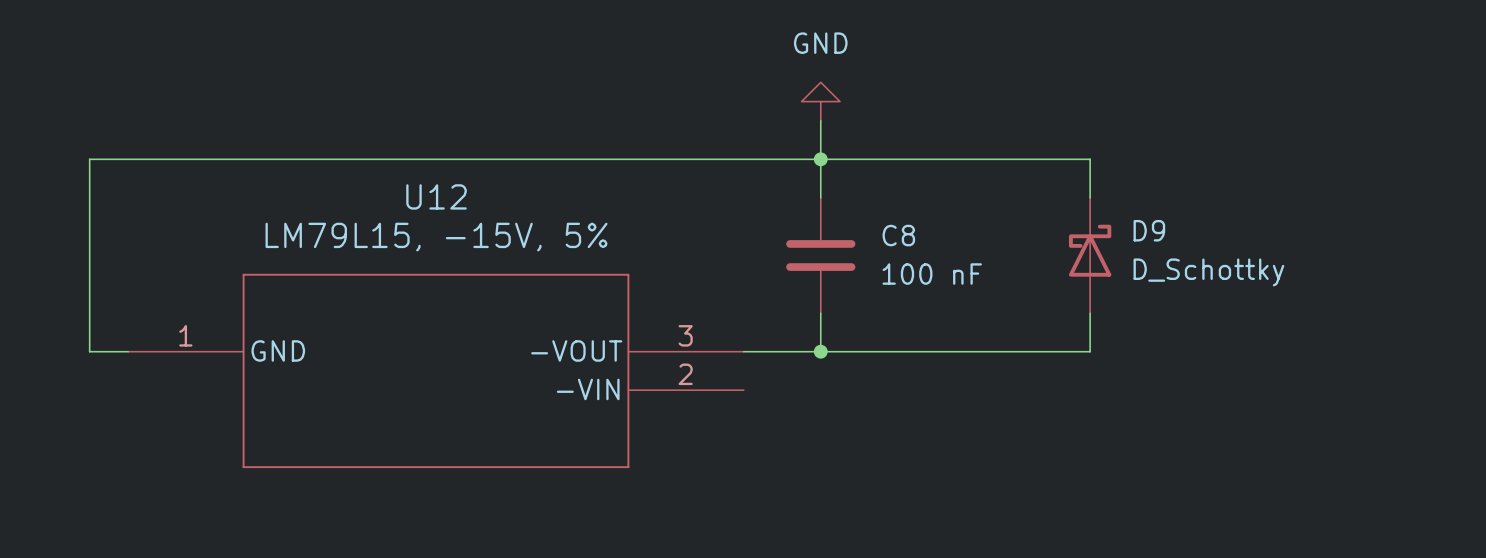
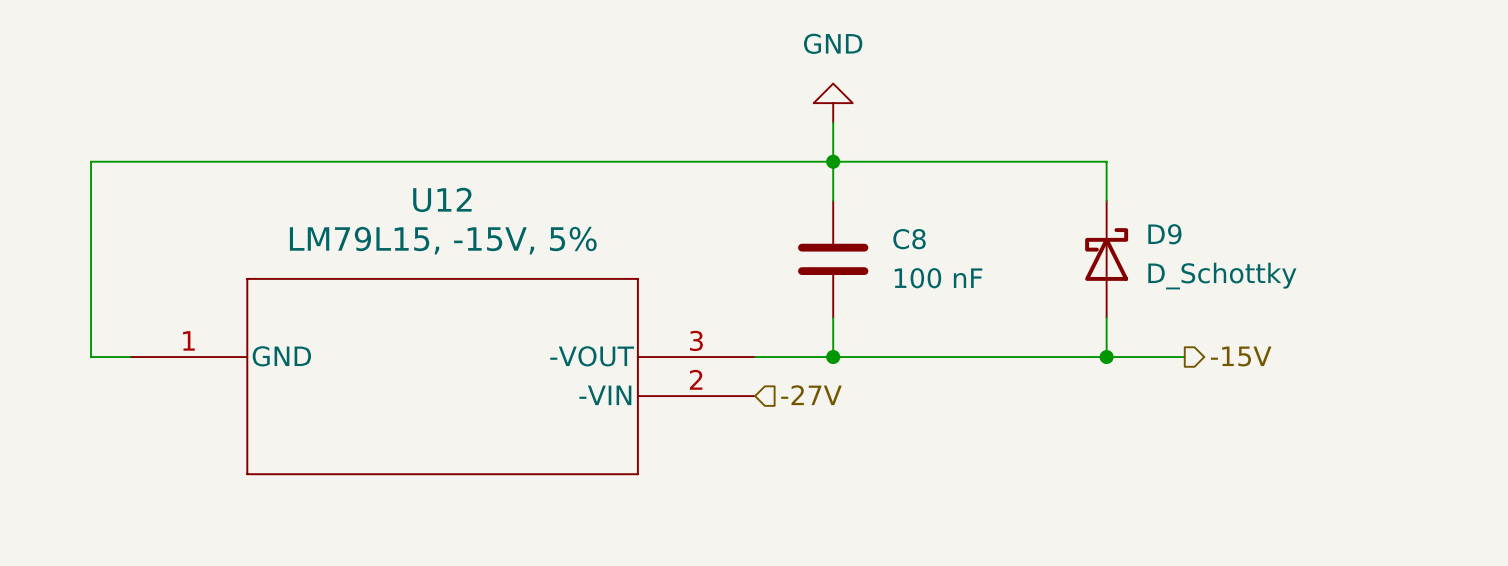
hierarchical label: none -> -15V (1241, 356)
wire: none -> (1106, 357) (1184, 357)
junction: none -> (1106, 357)
hierarchical label: none -> -27V (811, 395)

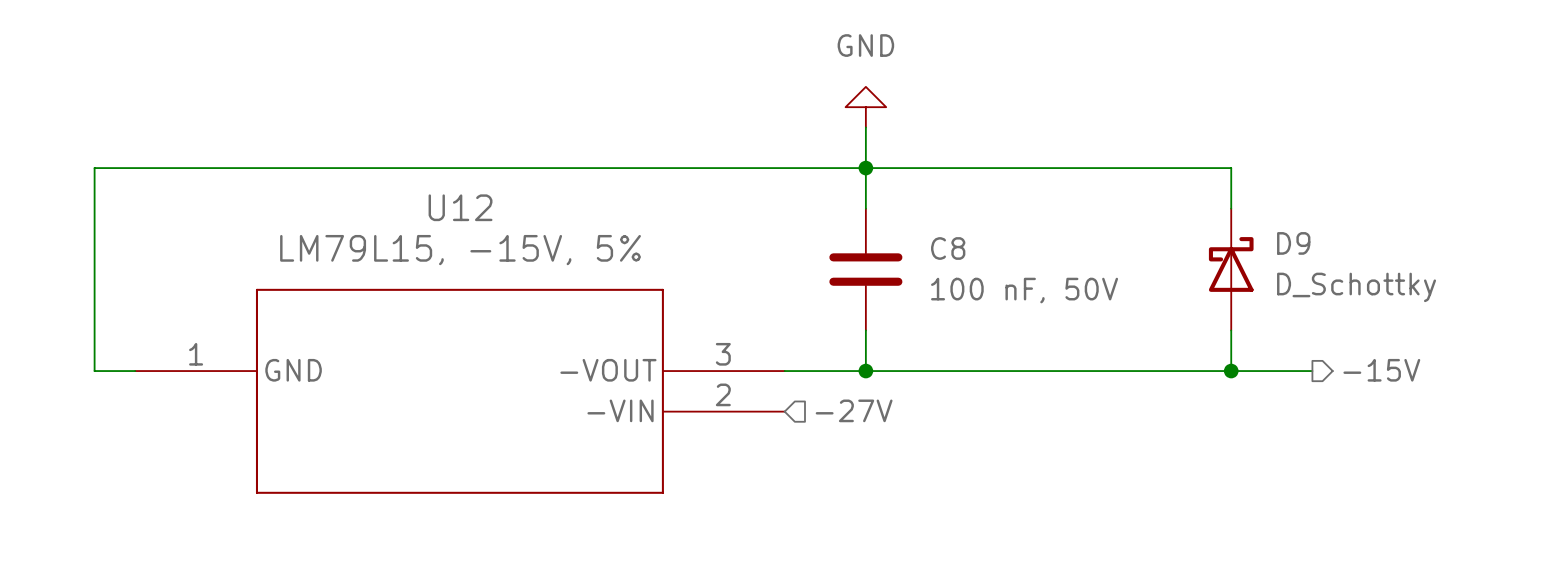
wire: (1106, 161) (1106, 200) -> (1150, 168) (1231, 168) (1231, 208)
D9 position: (1106, 259) -> (1231, 269)
C8 value: 100 nF (938, 278) -> 100 nF, 50V (1024, 290)
wire: (1106, 317) (1106, 357) -> none
wire: none -> (1231, 330) (1231, 371) (1312, 371)
hierarchical label position: -15V (1241, 356) -> -15V (1381, 370)
junction position: (1106, 357) -> (1231, 371)

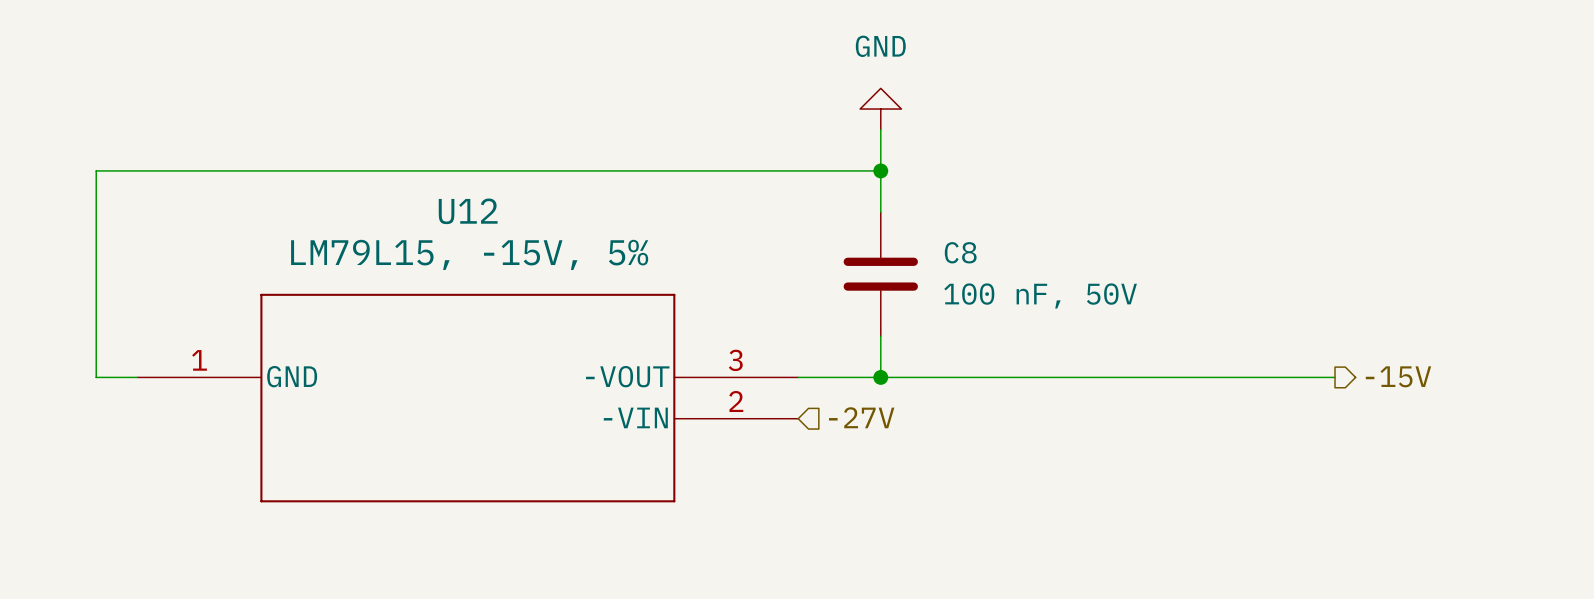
wire: (865, 168) (1231, 168) (1231, 208) -> none
D9: D_Schottky (1231, 269) -> none
wire: (1231, 330) (1231, 371) -> none
junction: (1231, 371) -> none

